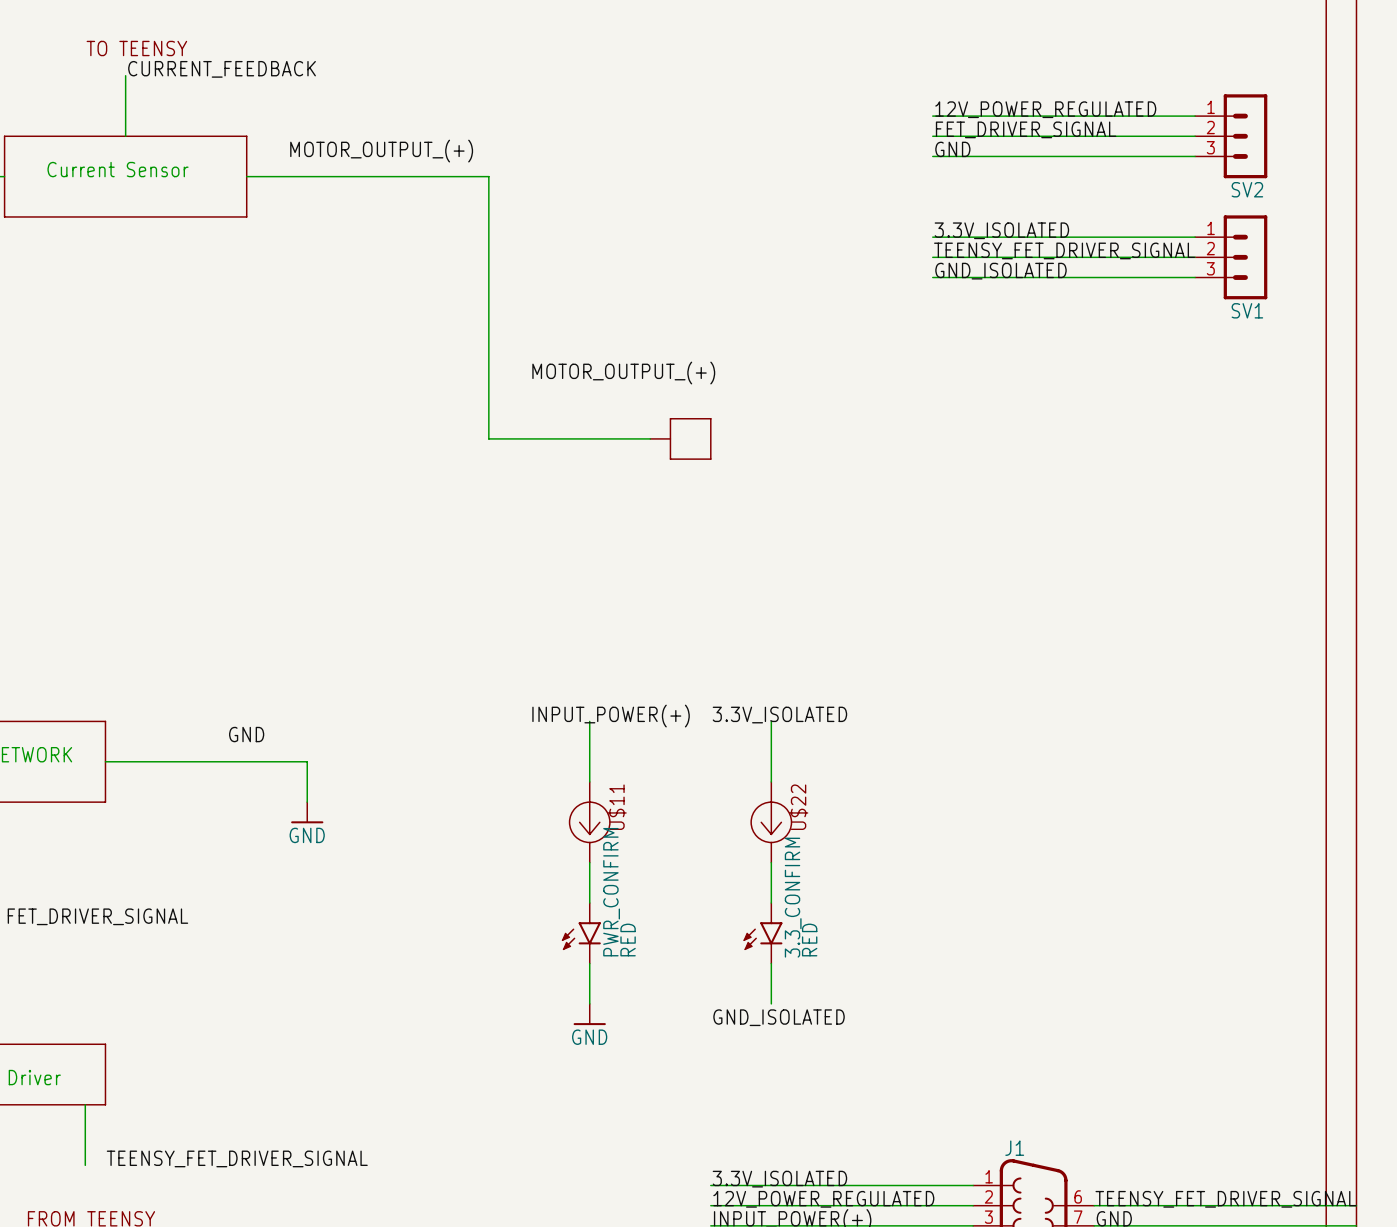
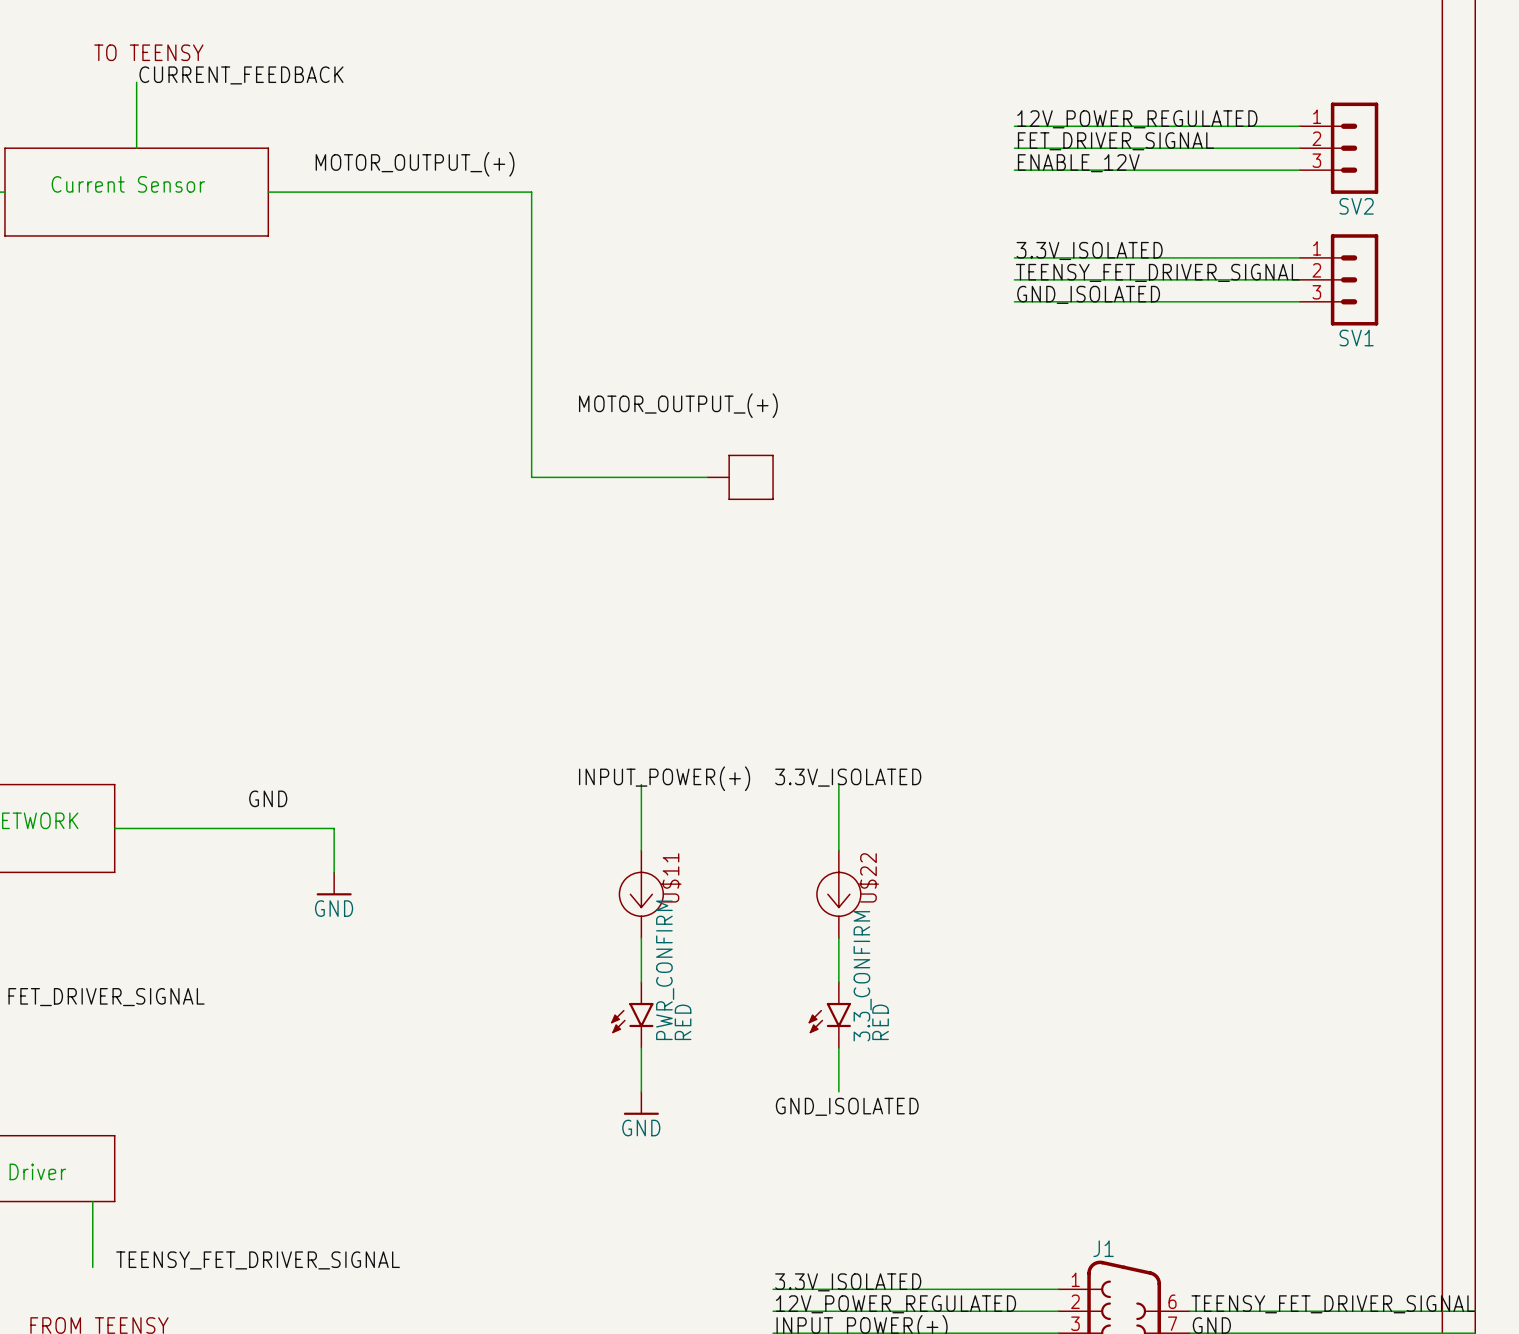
label: GND (952, 149) -> ENABLE_12V (1078, 163)

